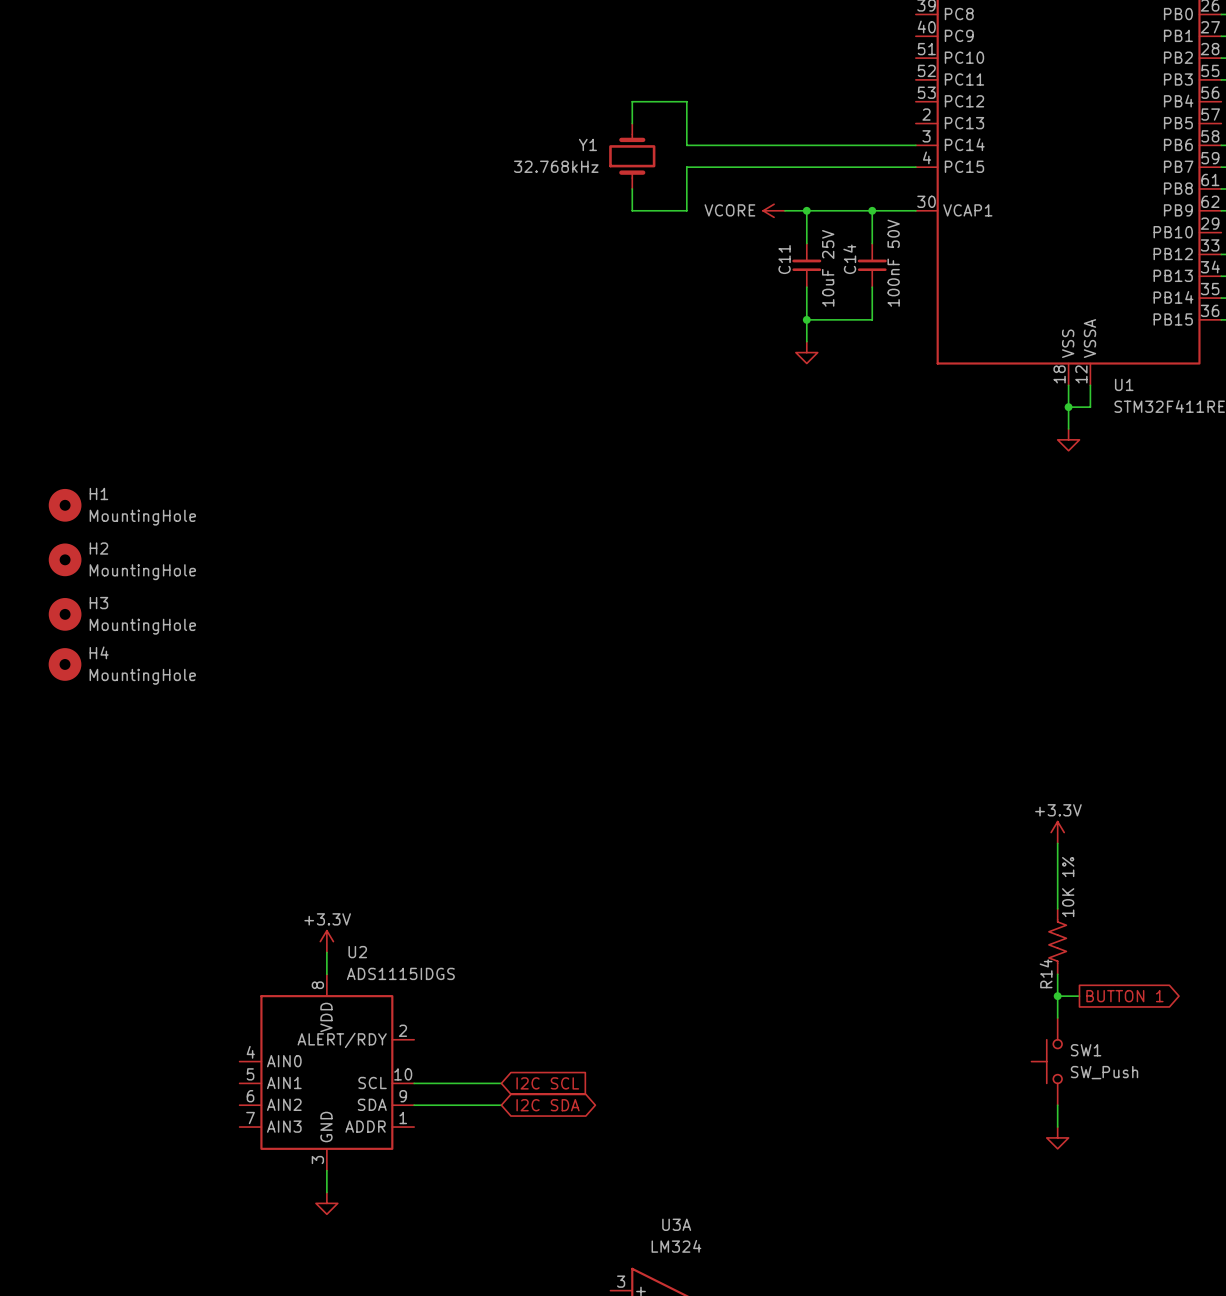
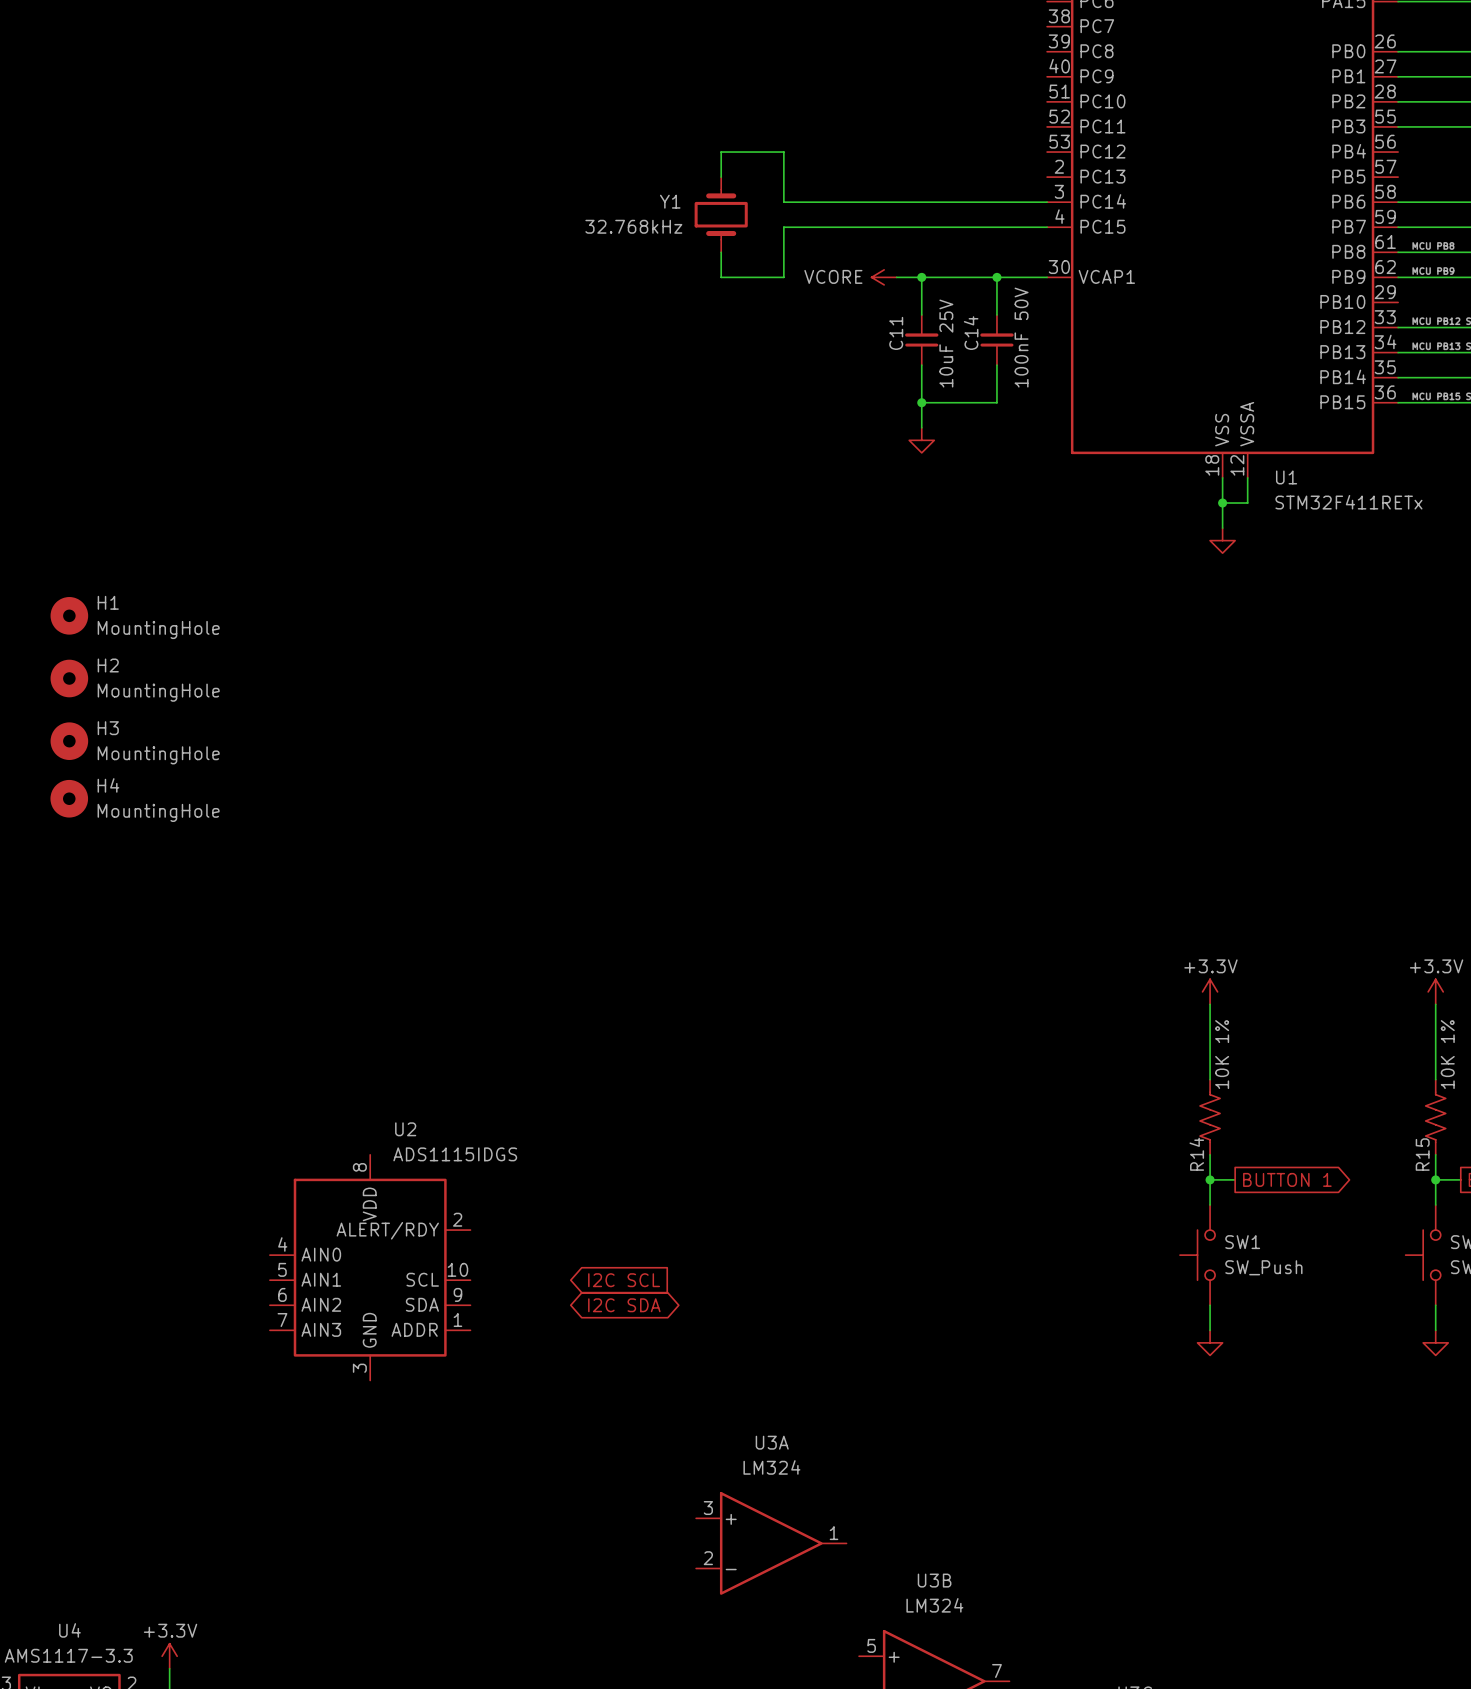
power symbol: +3.3V (326, 941) -> none
wire: (326, 952) (326, 974) -> none
wire: (414, 1083) (501, 1083) -> none
wire: (414, 1105) (501, 1105) -> none
wire: (326, 1170) (326, 1192) -> none
power symbol: (326, 1203) -> none

